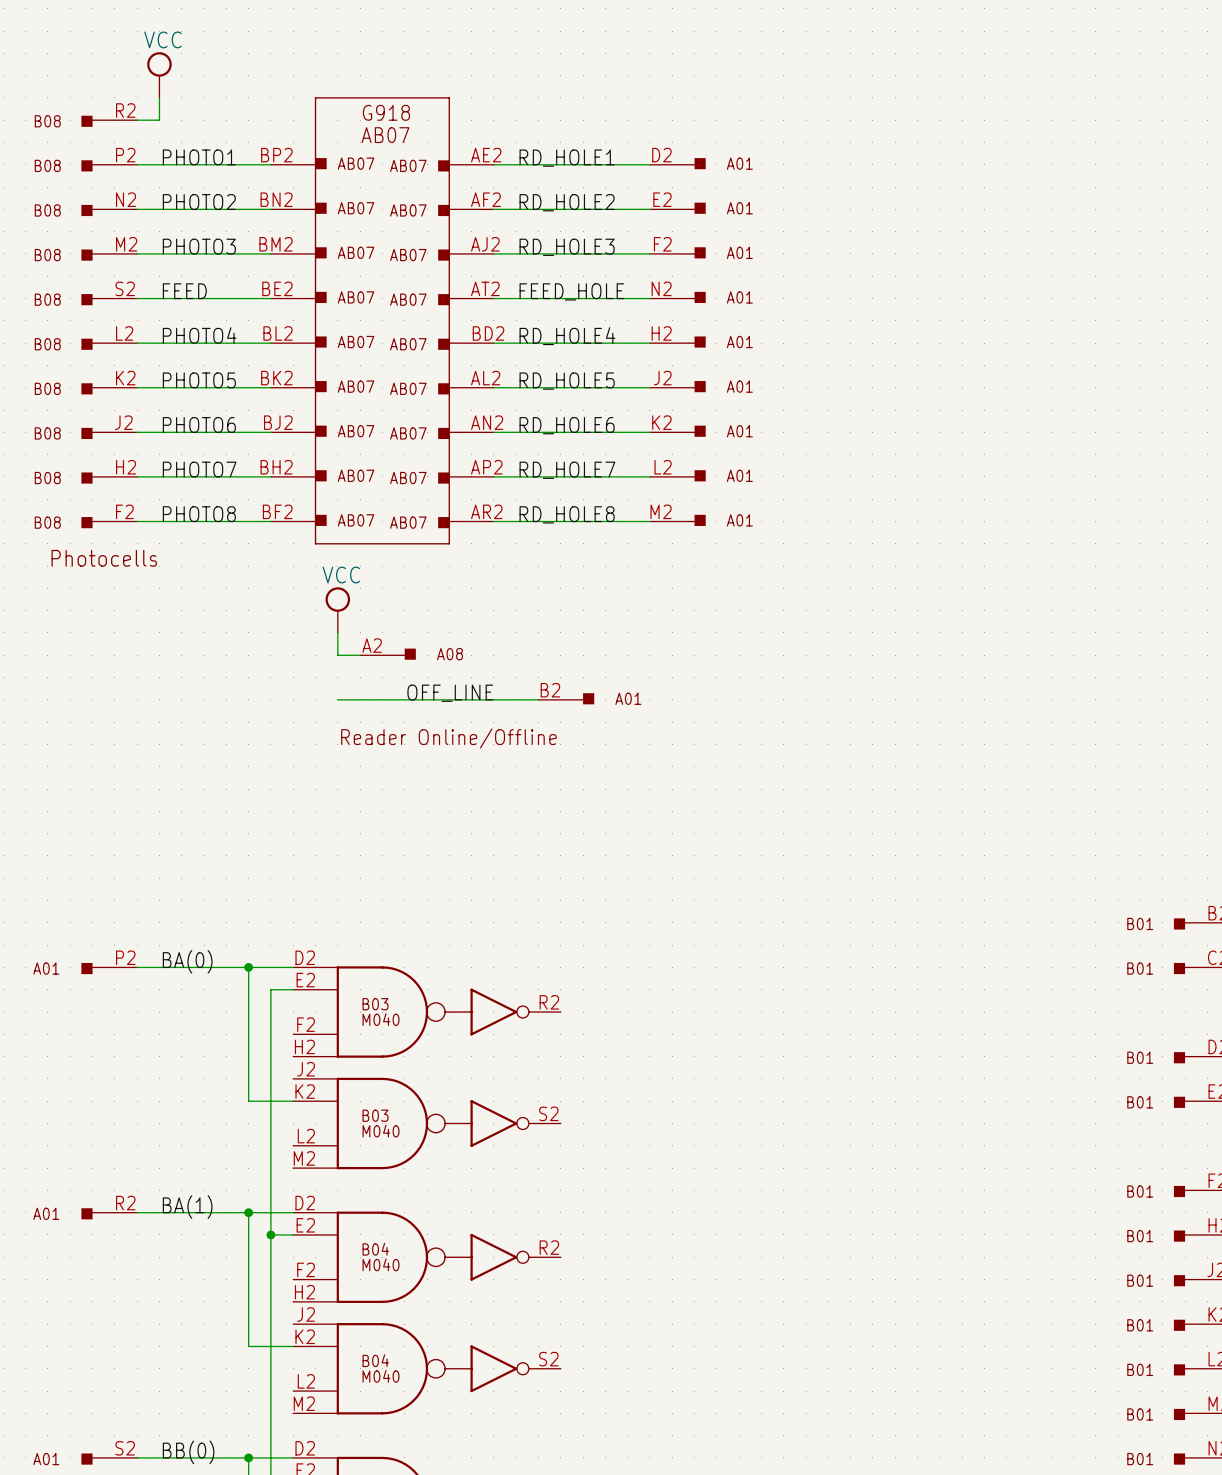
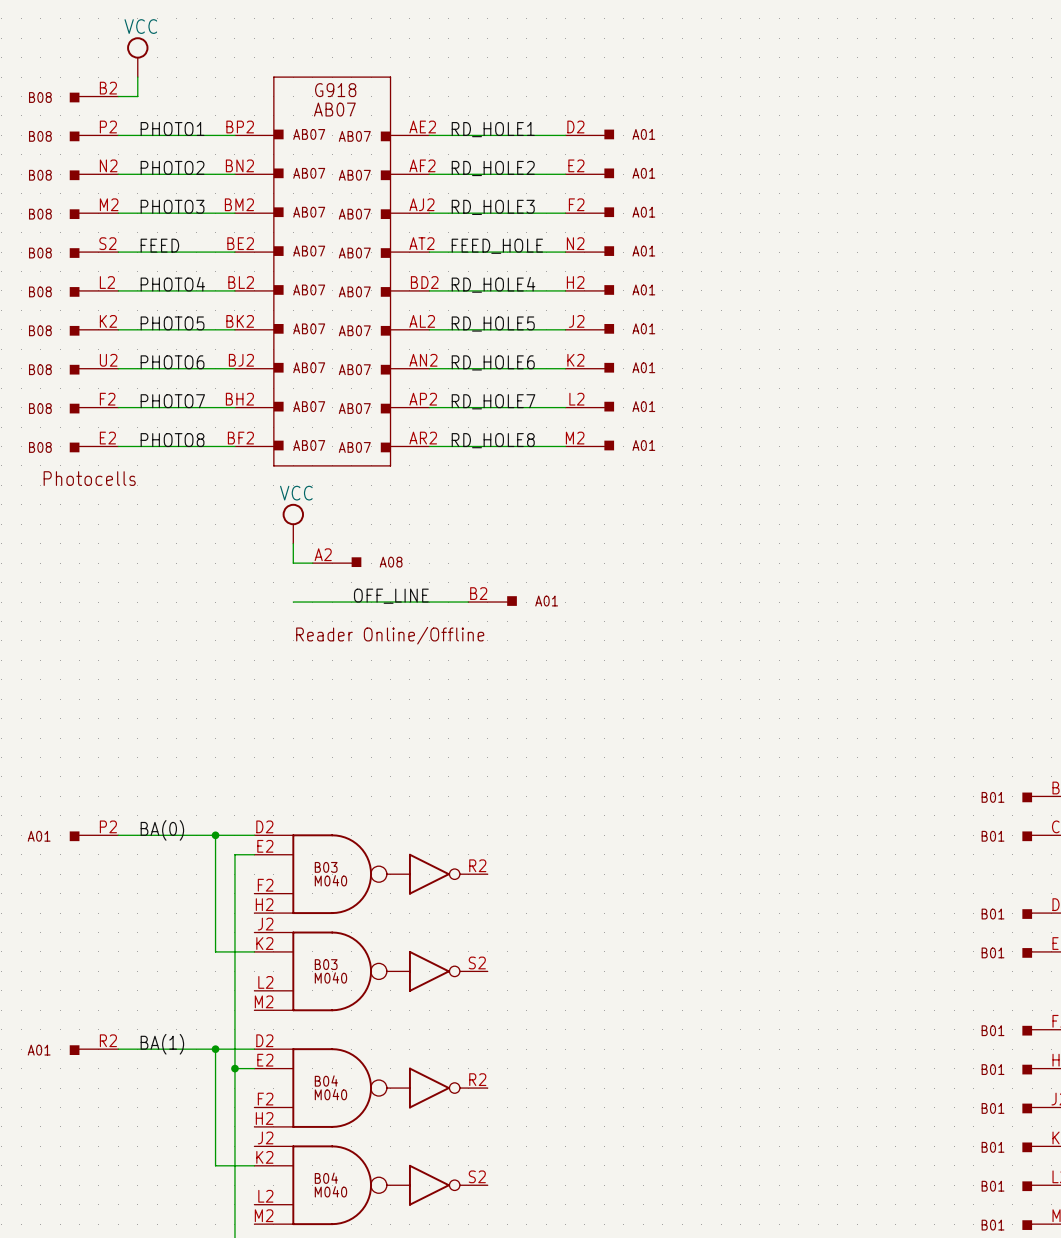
B08 pin number: R2 (125, 110) -> B2 (108, 88)
B08 pin number: J2 (123, 422) -> U2 (108, 360)
B08 pin number: H2 (126, 467) -> F2 (107, 399)
B08 pin number: F2 (124, 511) -> E2 (107, 438)

